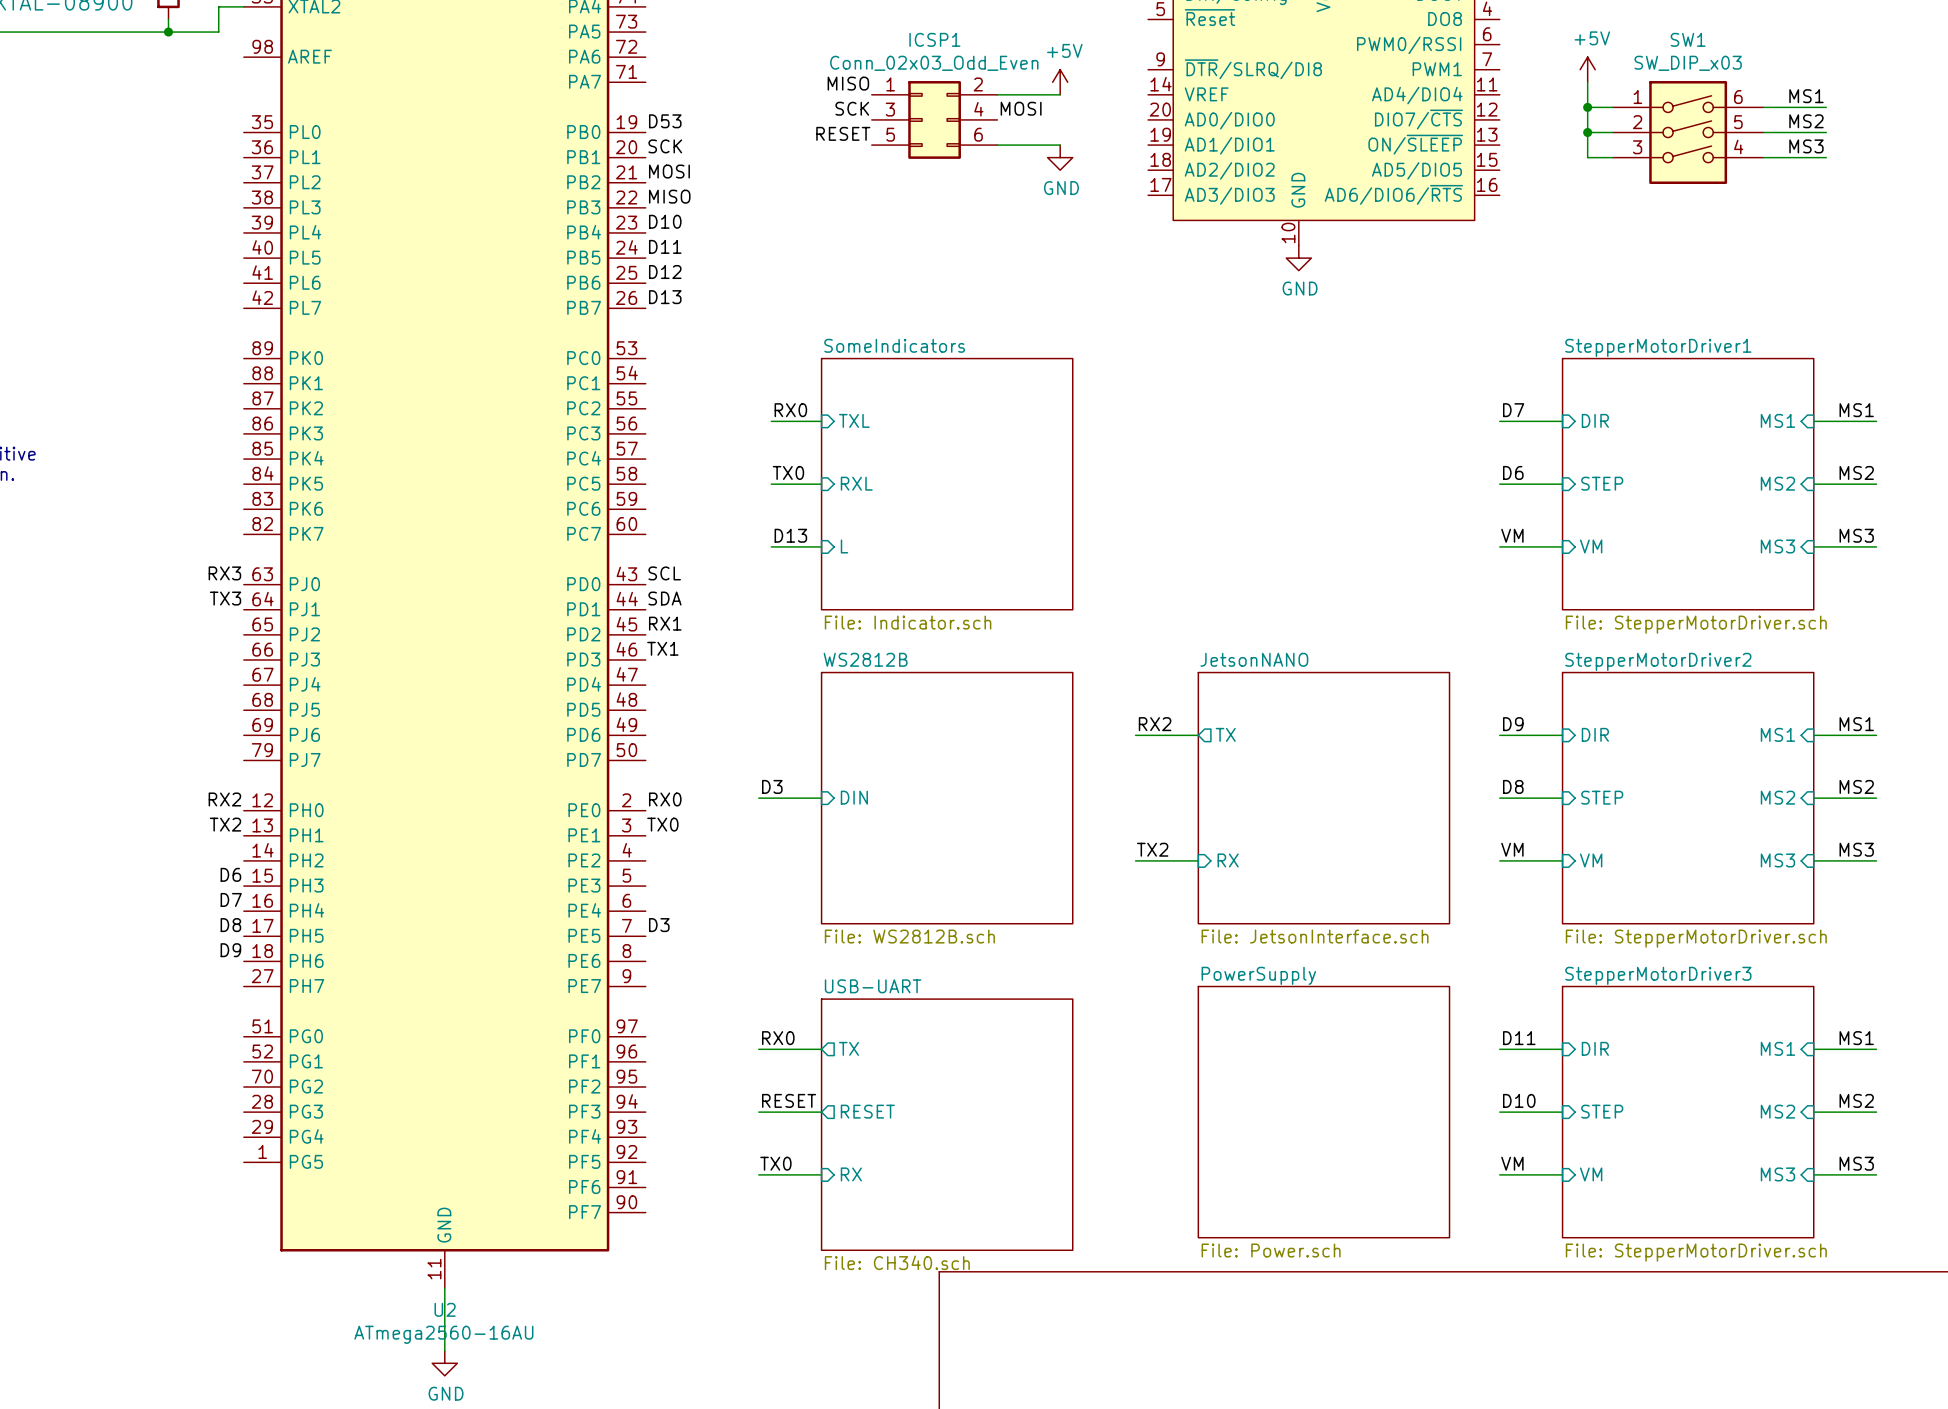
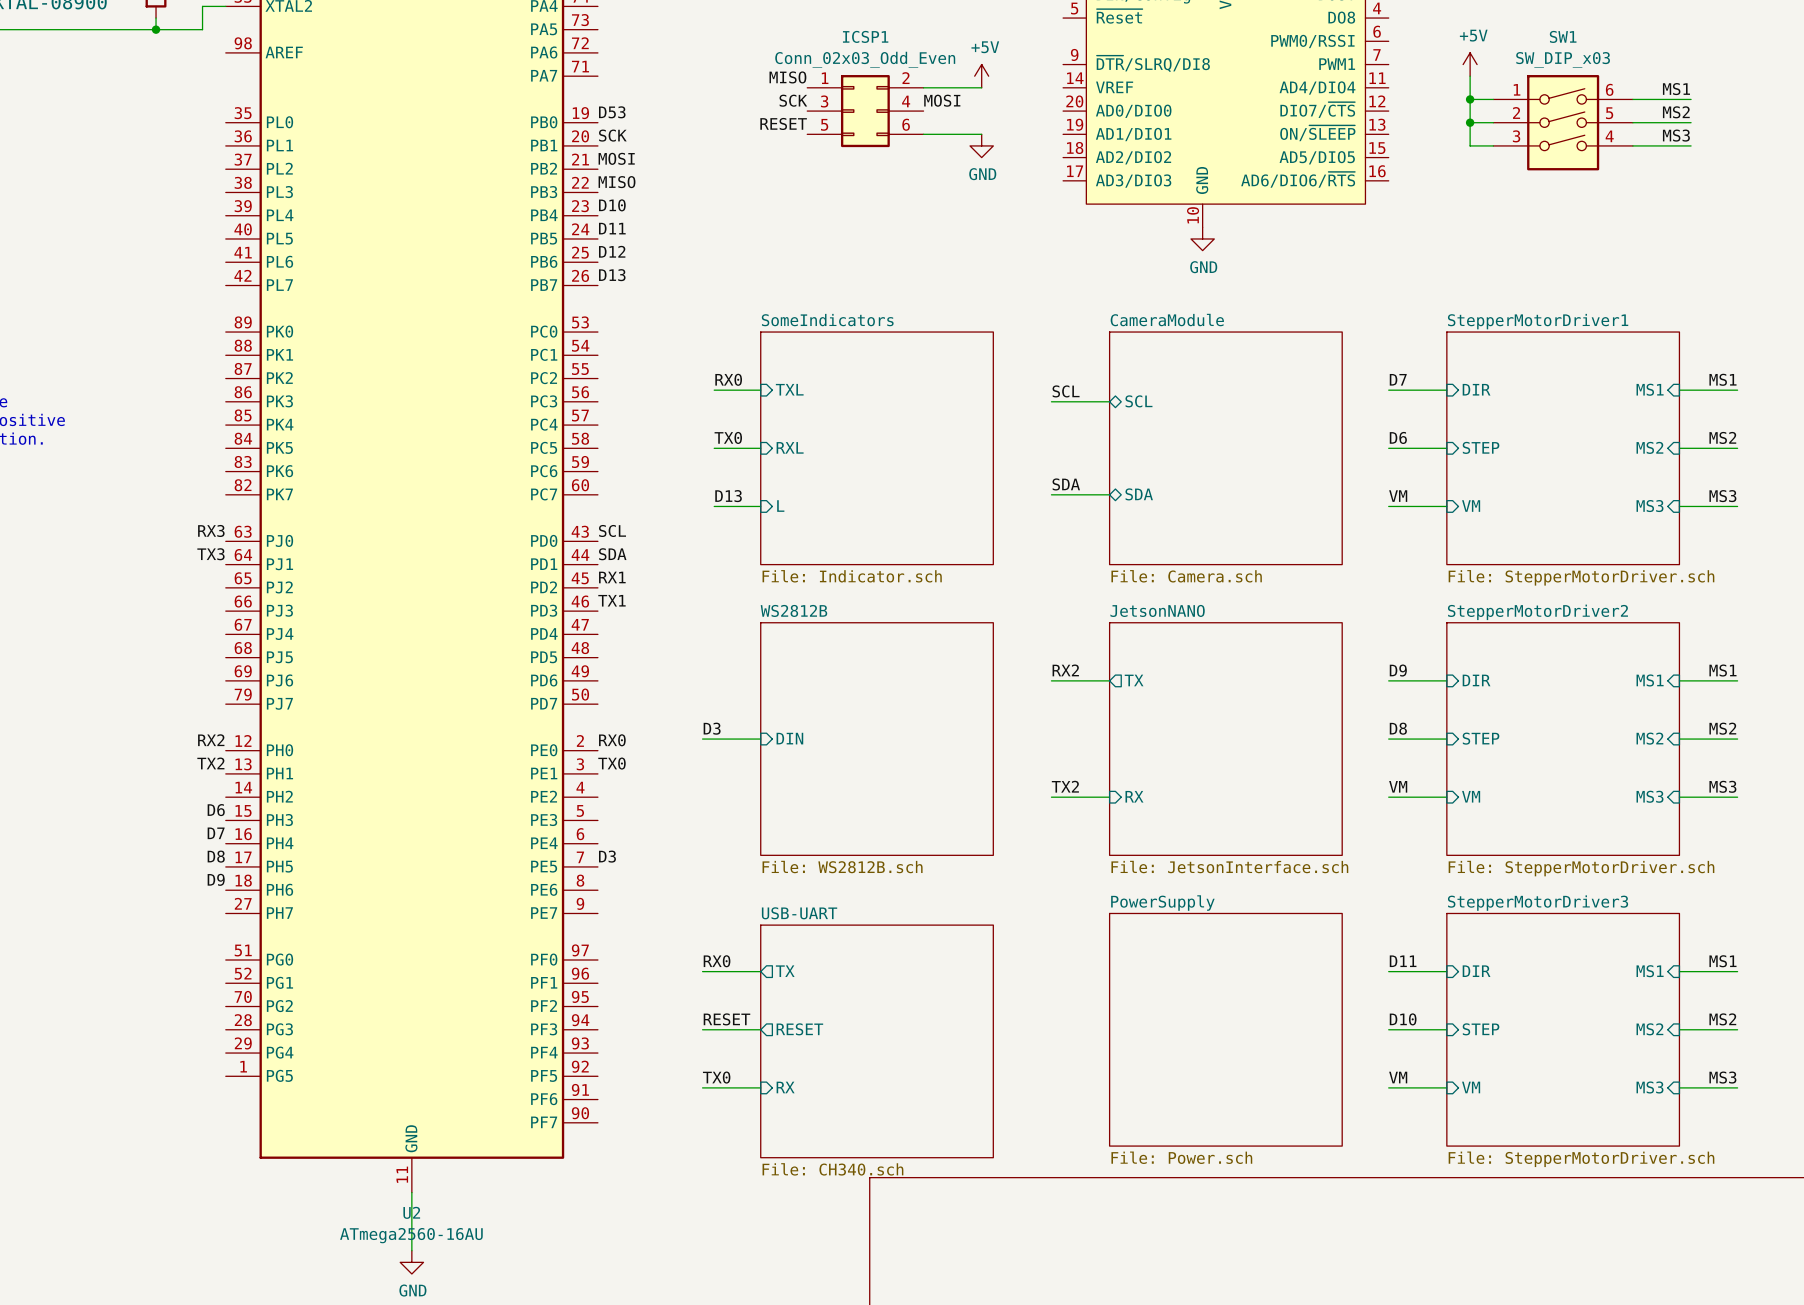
label: none -> SCL (1066, 391)
wire: none -> (1051, 401) (1109, 401)
sheet pin: none -> SCL (1138, 401)
sheet CameraModule: none -> File: Camera.sch (1225, 448)
label: none -> SDA (1066, 484)
sheet pin: none -> SDA (1139, 494)
wire: none -> (1051, 494) (1109, 494)

